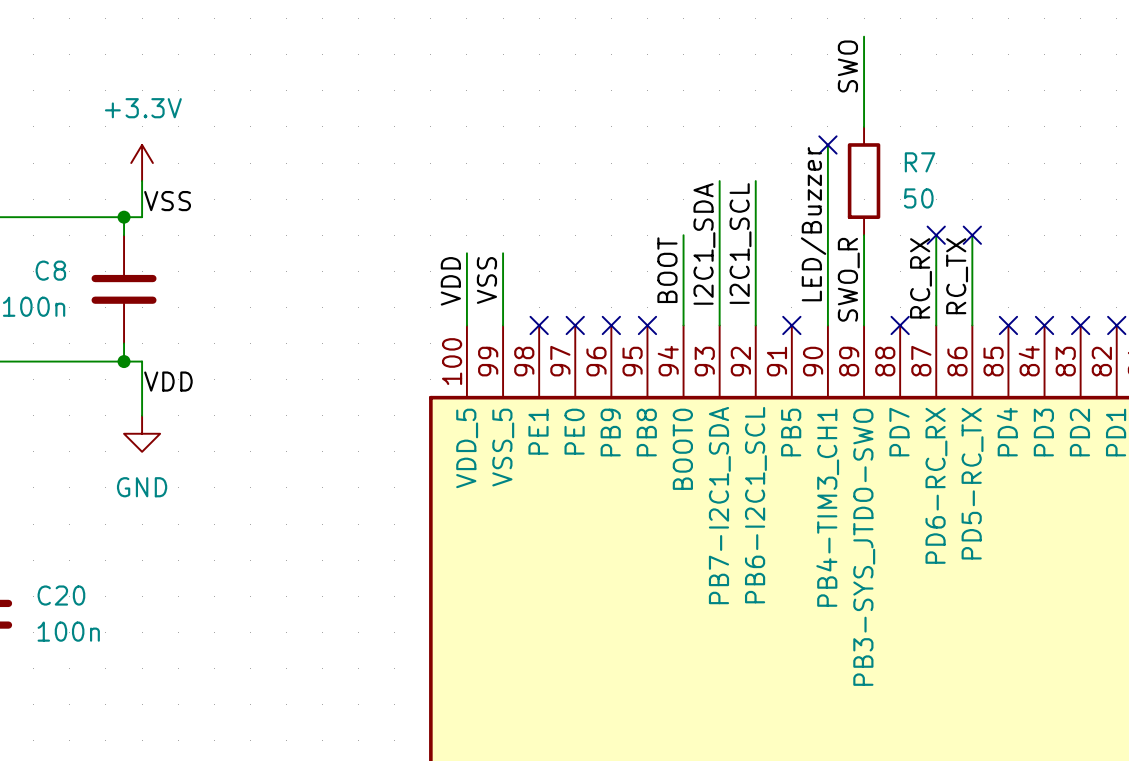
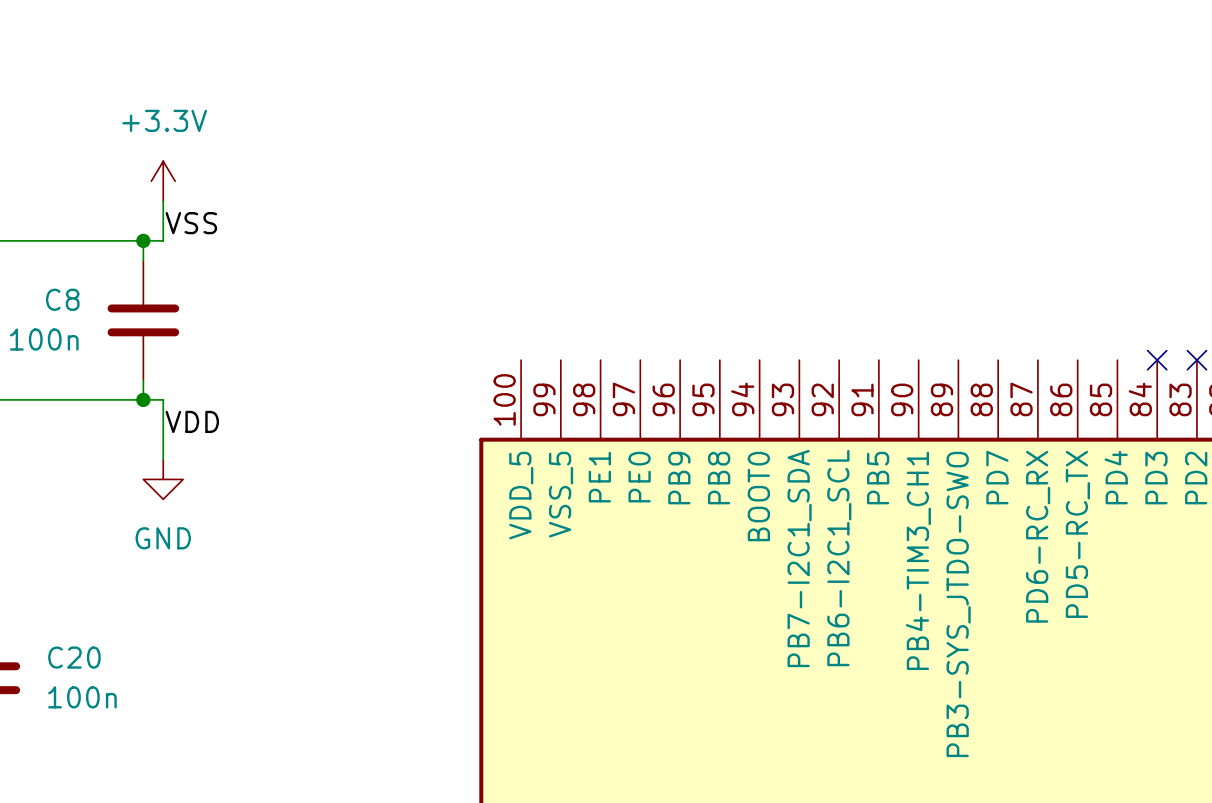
wire: (864, 36) (864, 126) -> none
label: SWO (847, 66) -> none
wire: (827, 144) (827, 325) -> none
no-connect mark: (827, 144) -> none
wire: (719, 181) (719, 325) -> none
wire: (755, 181) (755, 325) -> none
R7: 50 (864, 181) -> none
label: LED/Buzzer (813, 224) -> none
wire: (683, 235) (683, 325) -> none
wire: (864, 235) (864, 325) -> none
wire: (936, 235) (936, 325) -> none
no-connect mark: (936, 235) -> none
wire: (972, 235) (972, 325) -> none
no-connect mark: (972, 235) -> none
label: I2C1_SDA (704, 243) -> none
label: I2C1_SCL (740, 243) -> none
wire: (466, 253) (466, 325) -> none
wire: (503, 253) (503, 325) -> none
label: BOOT (667, 270) -> none
label: RC_TX (957, 276) -> none
label: RC_RX (920, 278) -> none
label: SWO_R (848, 279) -> none
label: VSS (486, 280) -> none
label: VDD (450, 281) -> none
no-connect mark: (539, 325) -> none
no-connect mark: (575, 325) -> none
no-connect mark: (611, 325) -> none
no-connect mark: (647, 325) -> none
no-connect mark: (791, 325) -> none
no-connect mark: (900, 325) -> none
no-connect mark: (1008, 325) -> none

